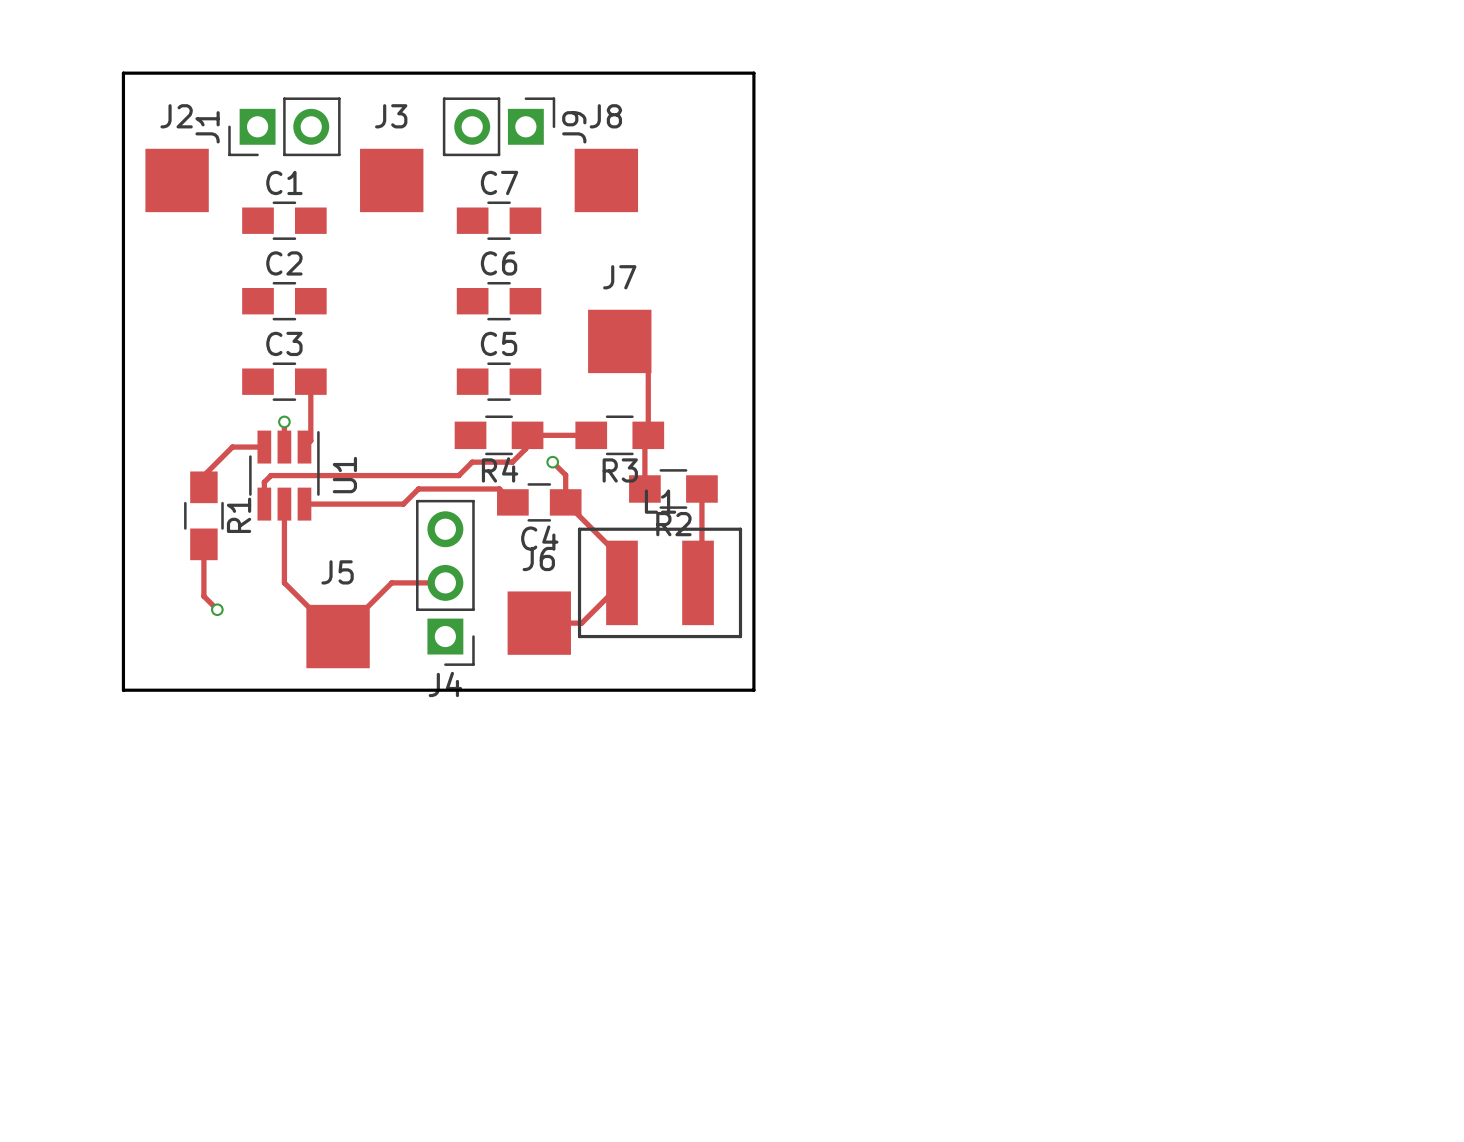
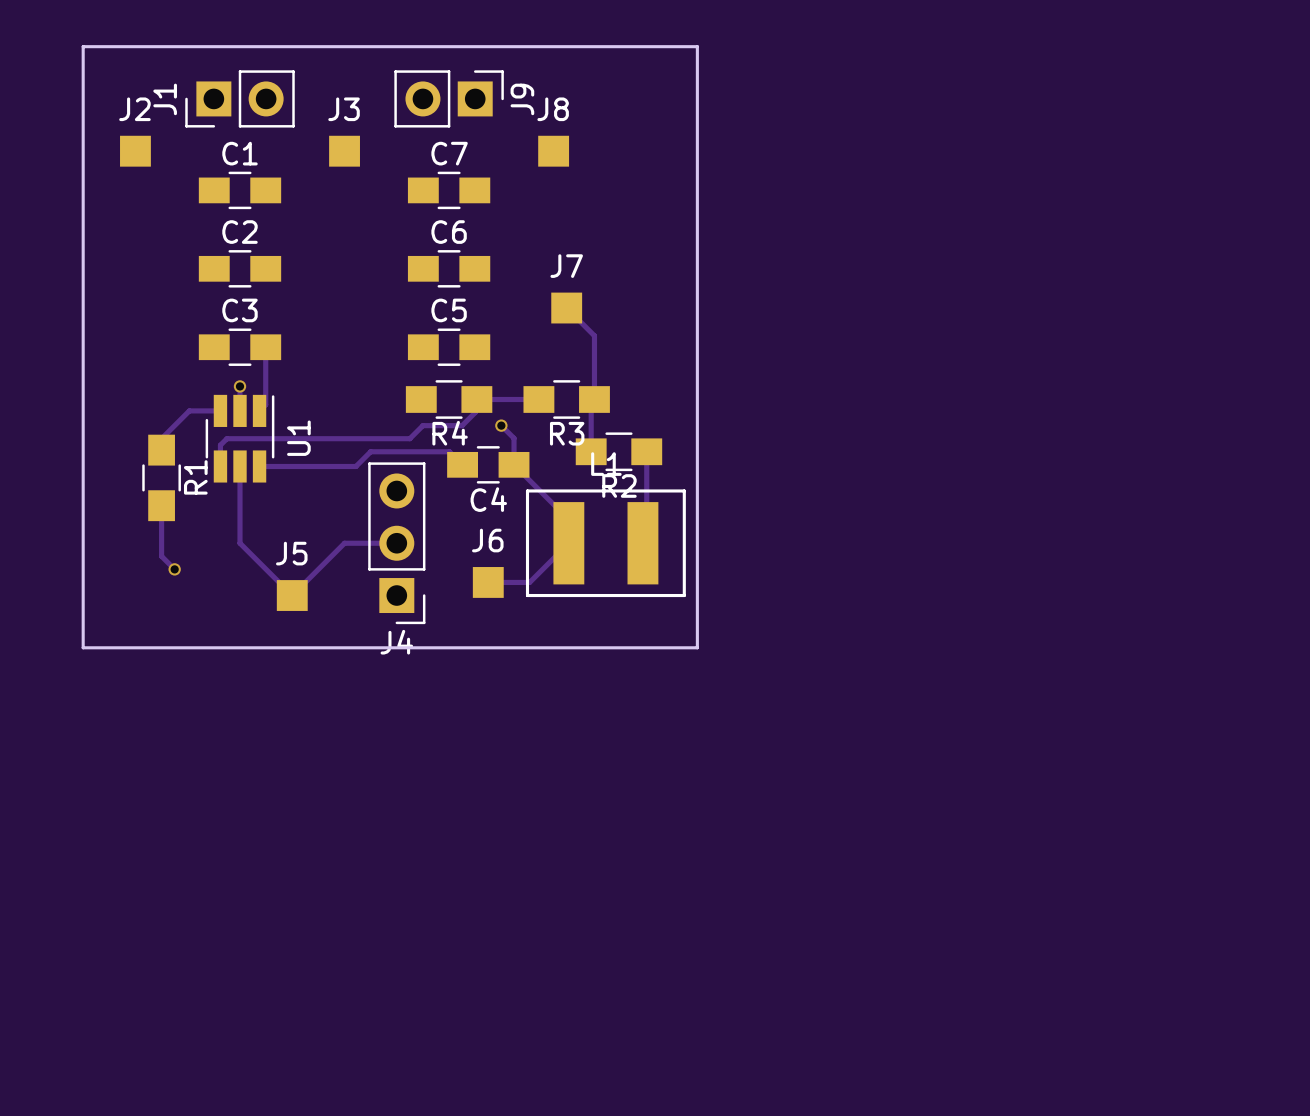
J2 footprint: [145, 148, 209, 213] -> [120, 135, 151, 167]
J3 footprint: [360, 148, 424, 213] -> [329, 135, 360, 167]
J8 footprint: [574, 148, 639, 213] -> [538, 135, 570, 167]
J7 footprint: [588, 309, 652, 374] -> [551, 292, 583, 324]
J6 footprint: [507, 591, 571, 655] -> [472, 567, 504, 598]
J5 footprint: [306, 604, 370, 669] -> [276, 580, 308, 611]

